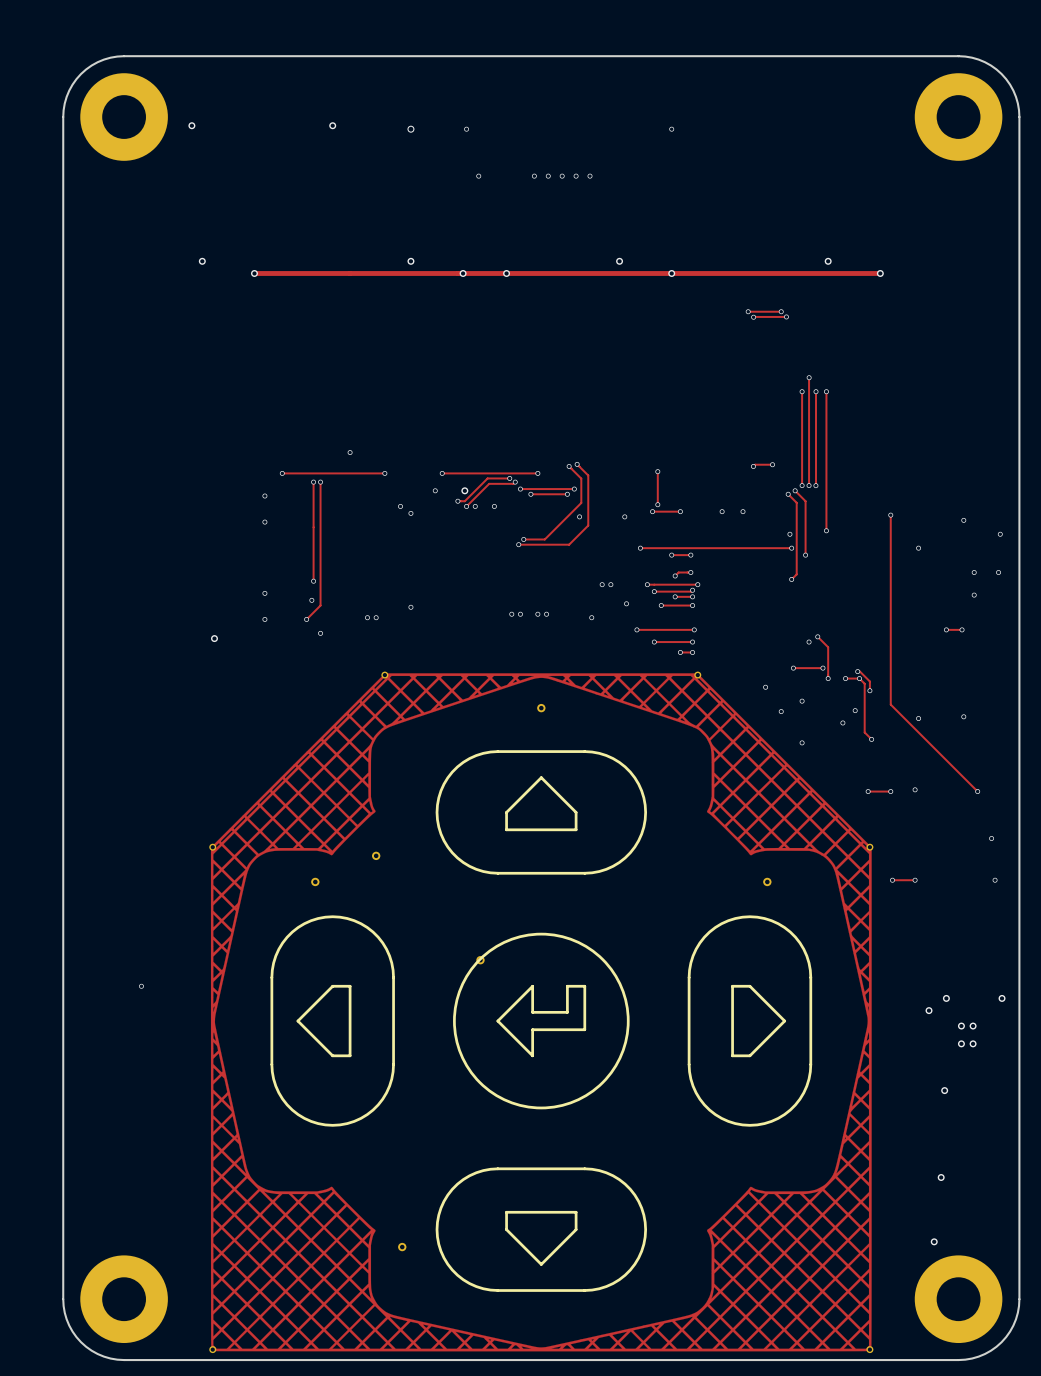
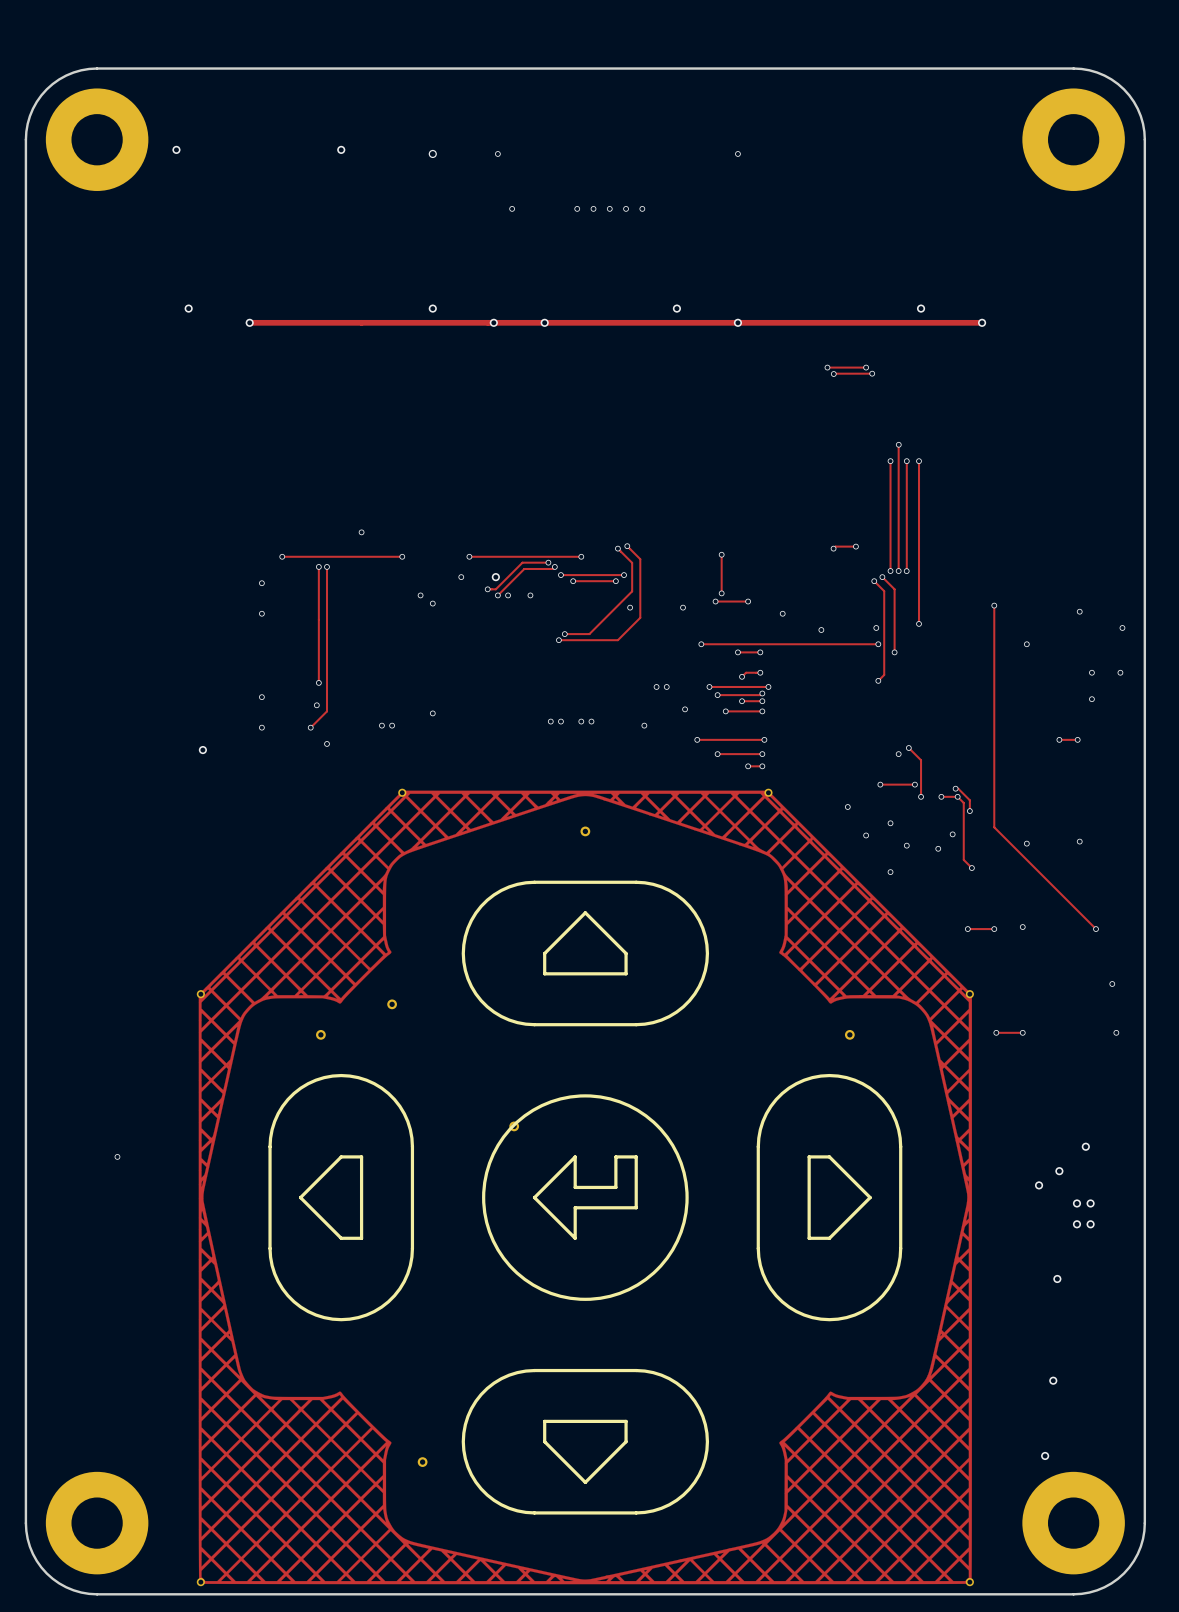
via: (722, 511) -> none
via: (742, 511) -> none
via: none -> (782, 613)
via: none -> (821, 630)
via: none -> (906, 845)
via position: (1002, 998) -> (1085, 1146)

